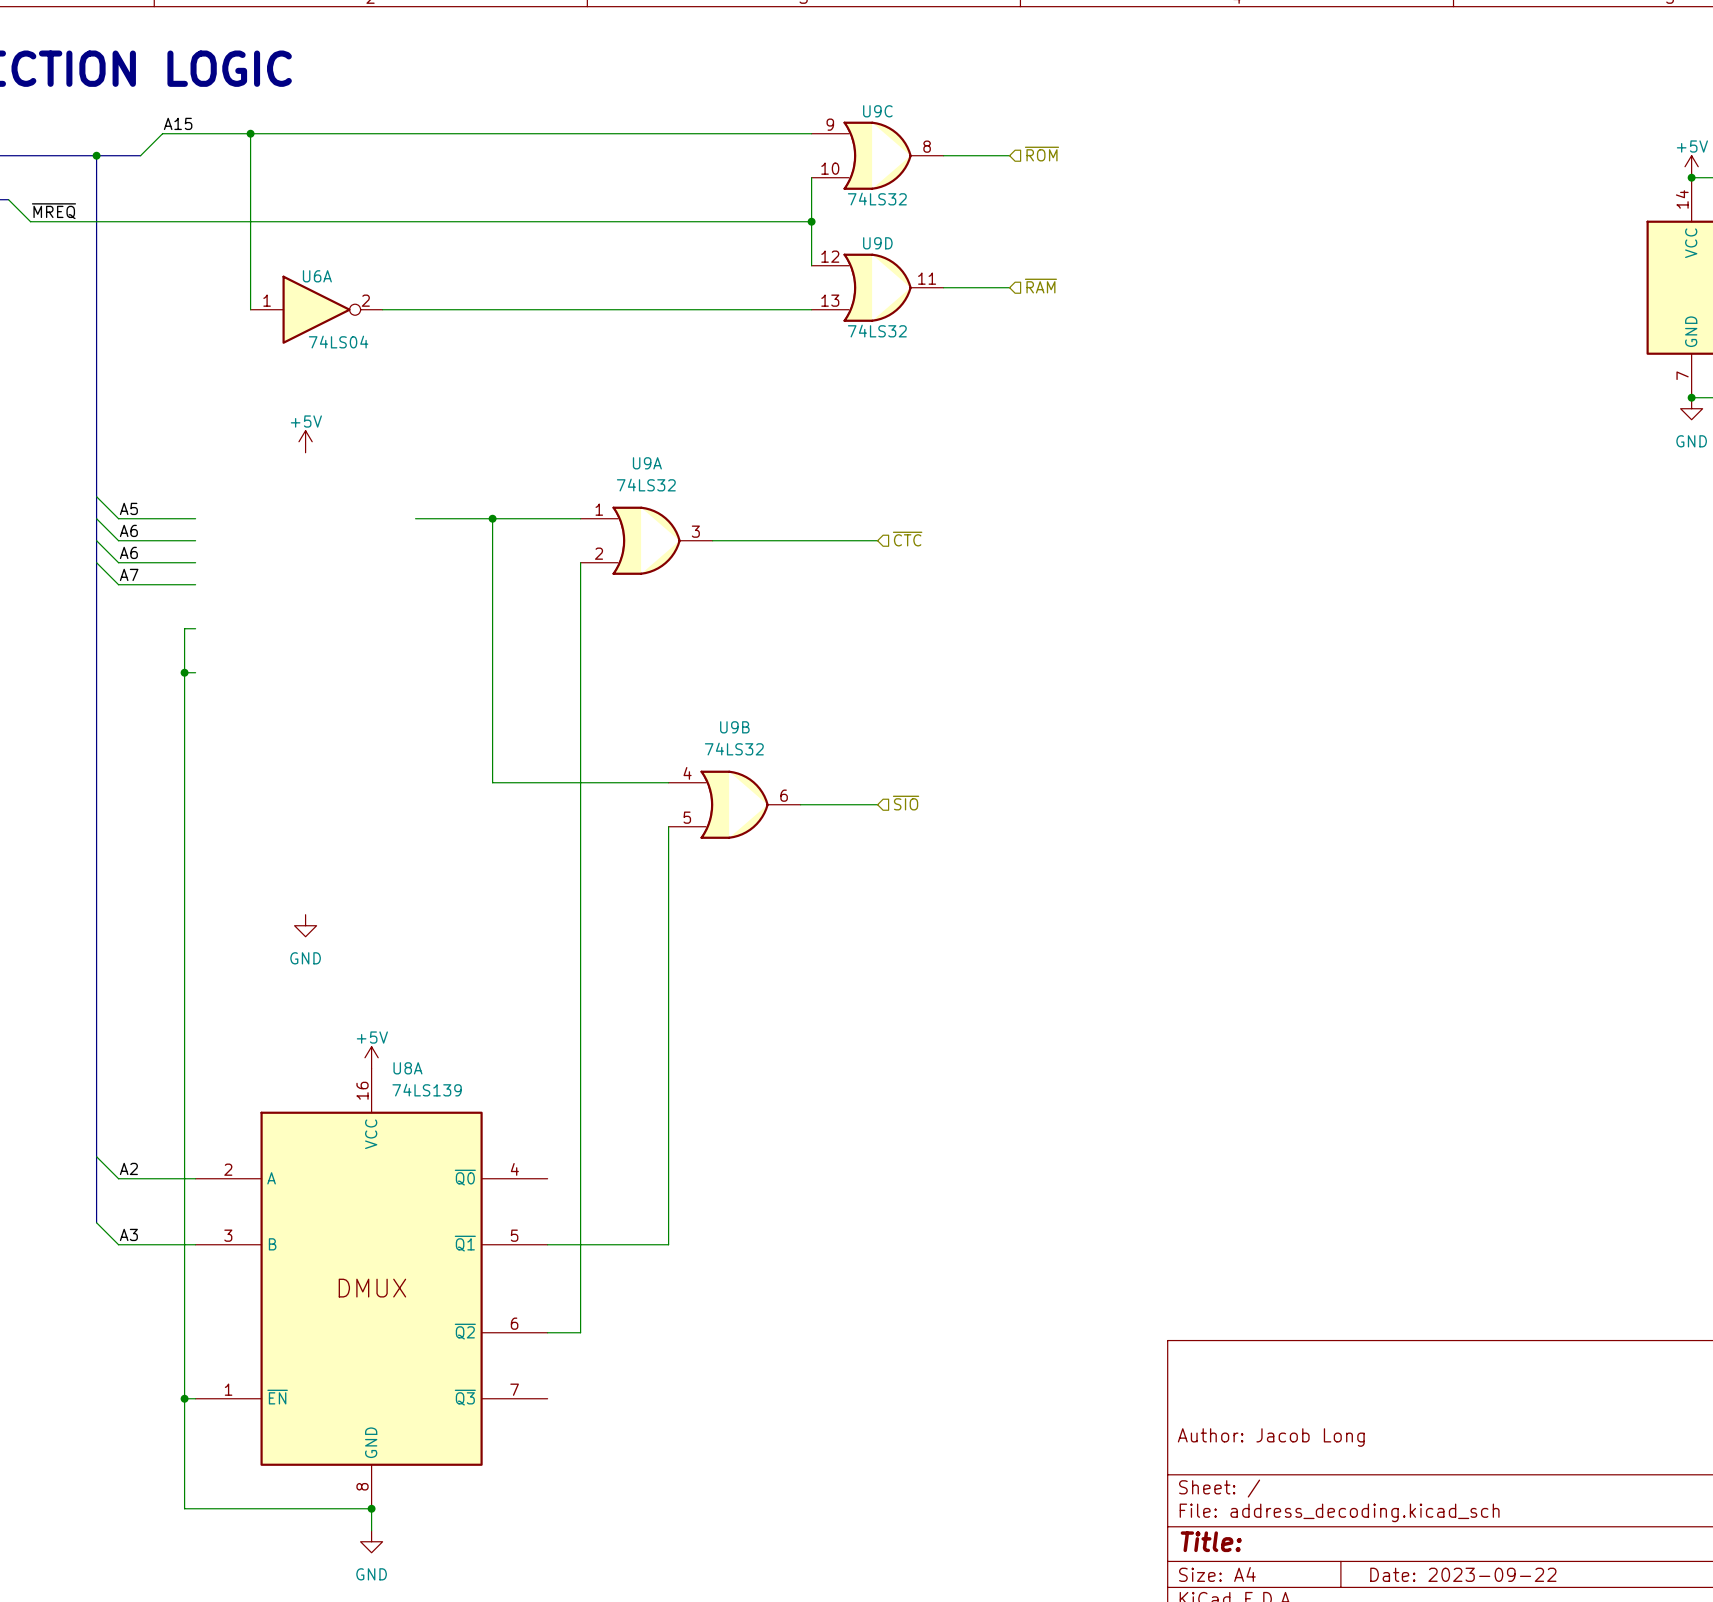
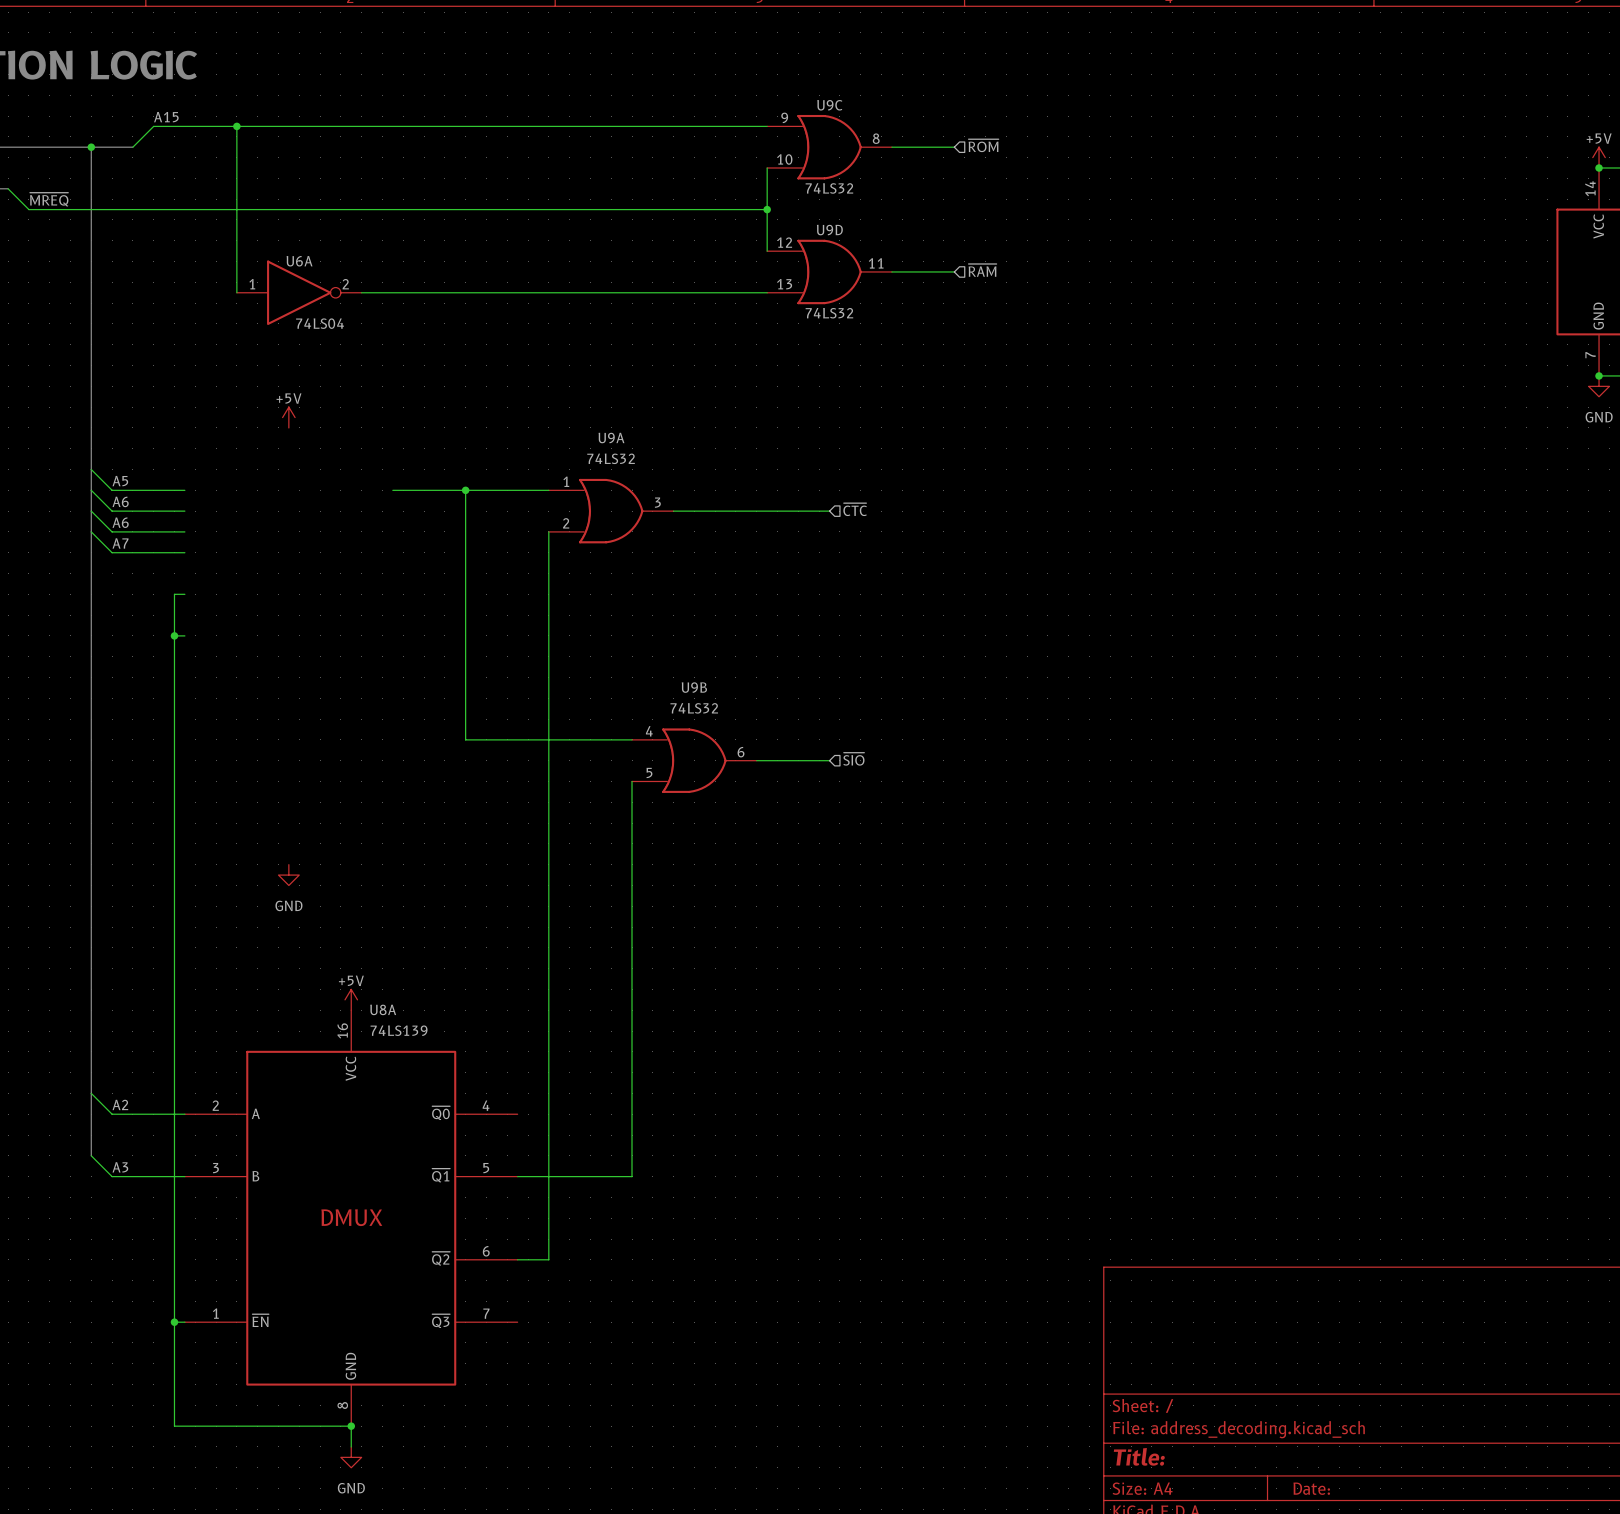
title block: Author: Jacob Long (1271, 1437) -> none
title block: Date: 2023-09-22 (1463, 1574) -> Date: (1311, 1488)

